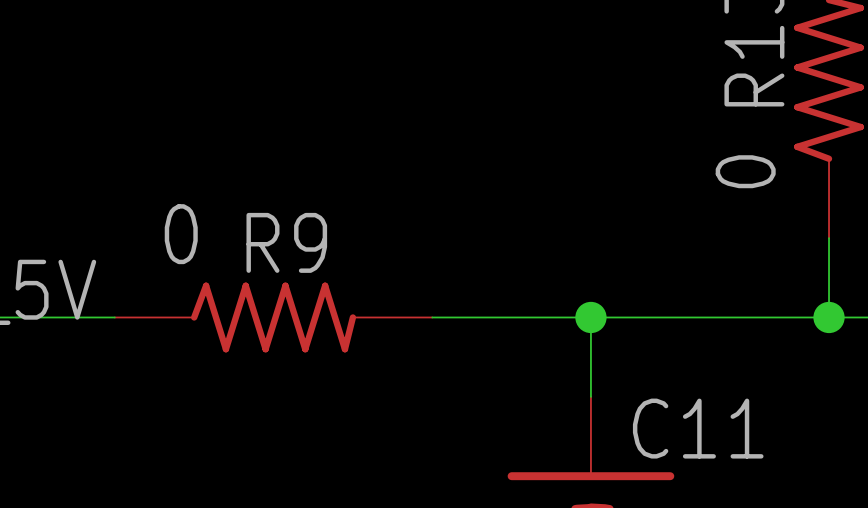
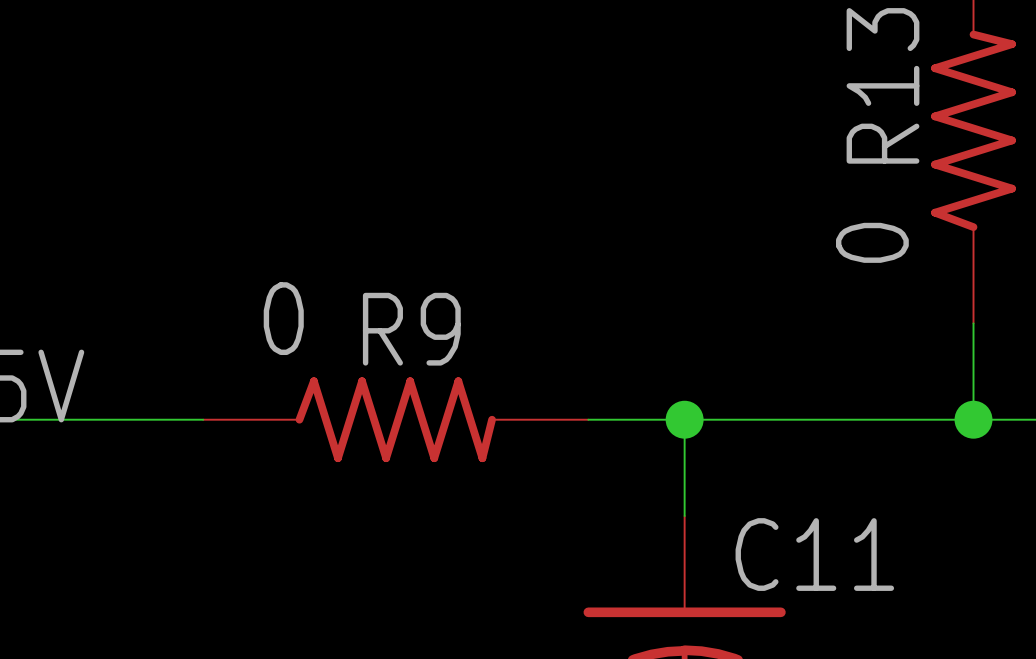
R9 position: (273, 317) -> (395, 419)

